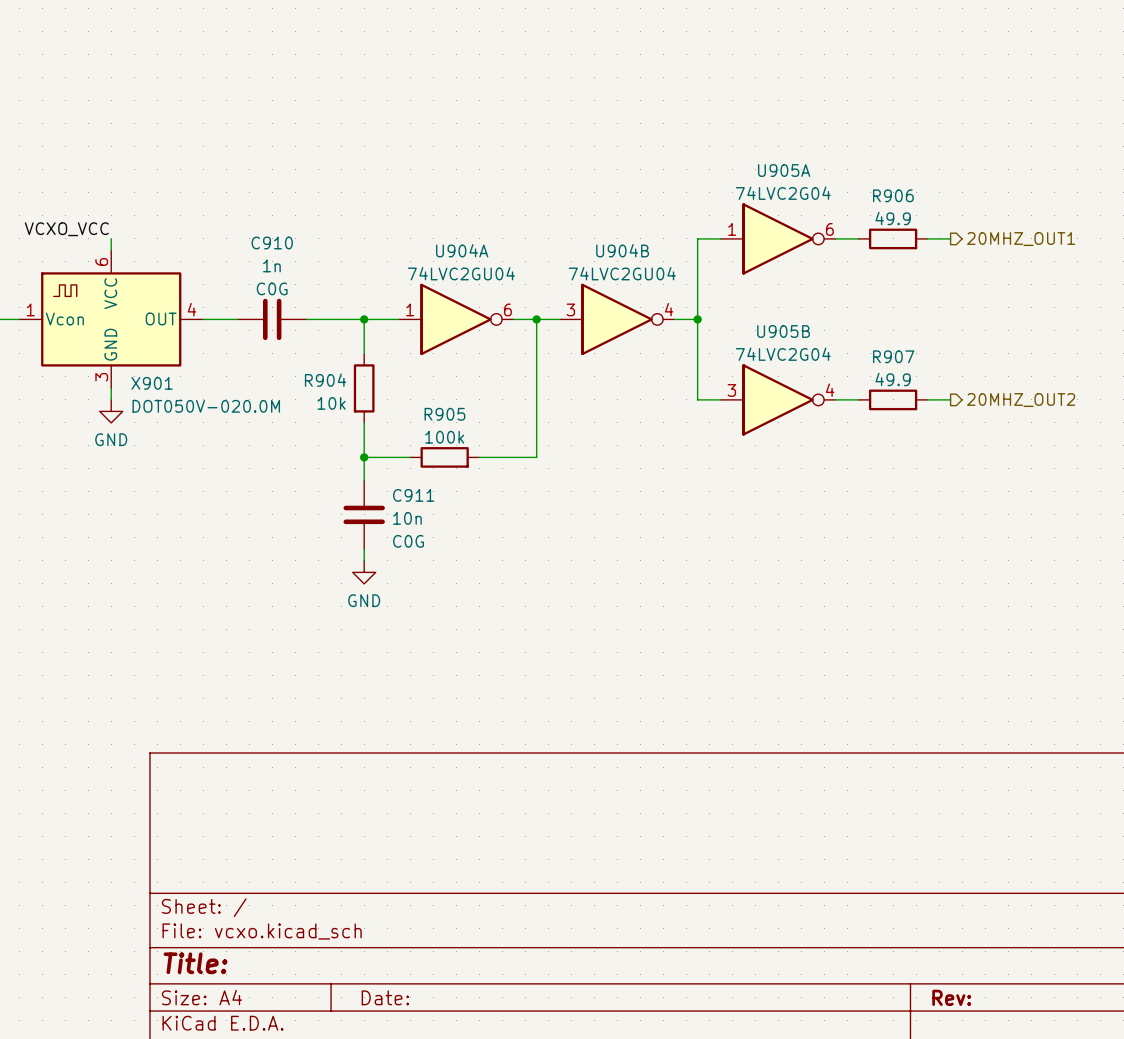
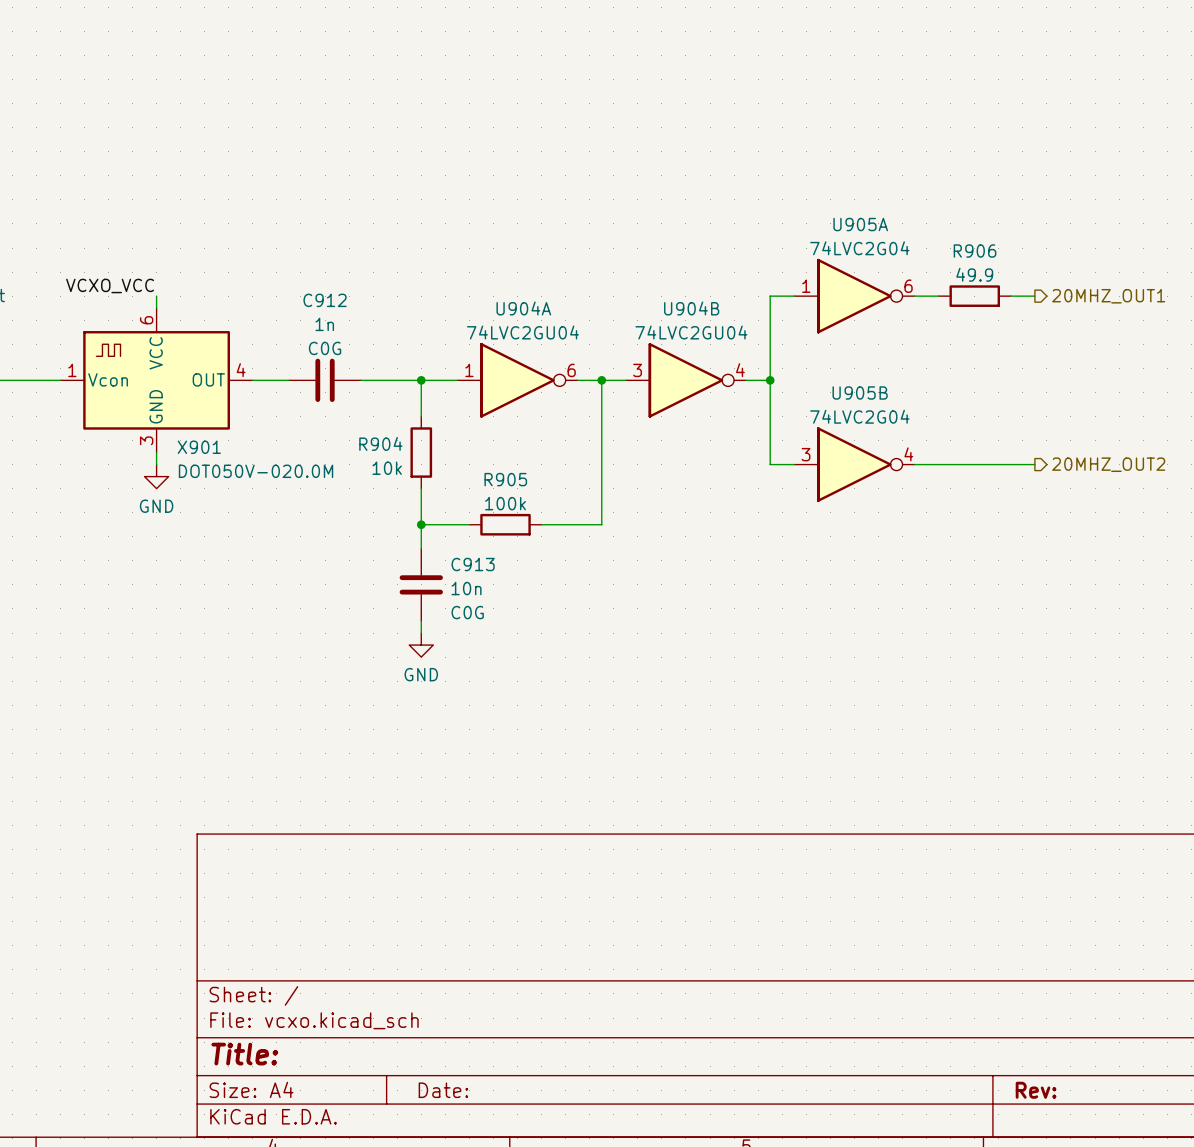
C910 name: C910 (272, 242) -> C912 (325, 300)
wire: none -> (938, 464) (1010, 464)
R907: 49.9 (893, 399) -> none
C911 name: C911 (413, 495) -> C913 (473, 564)

